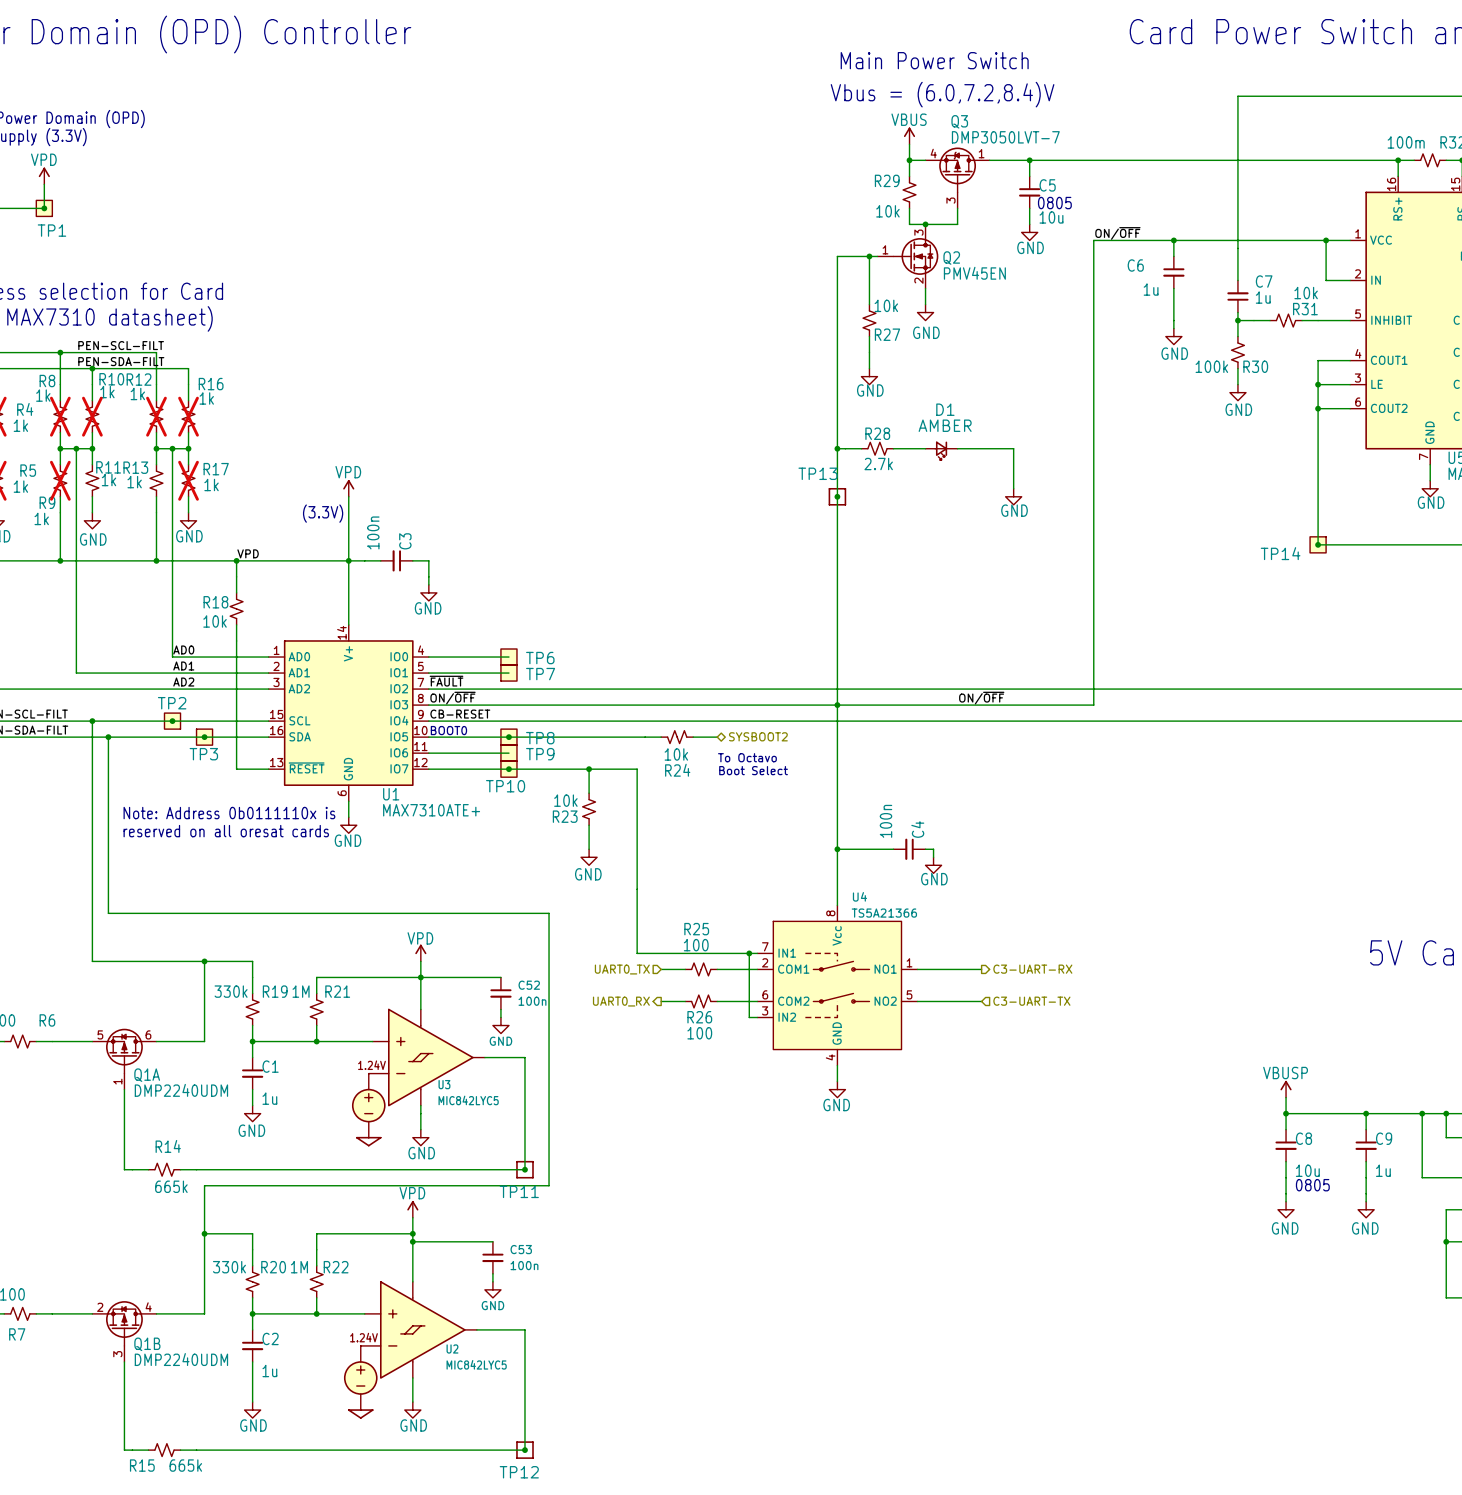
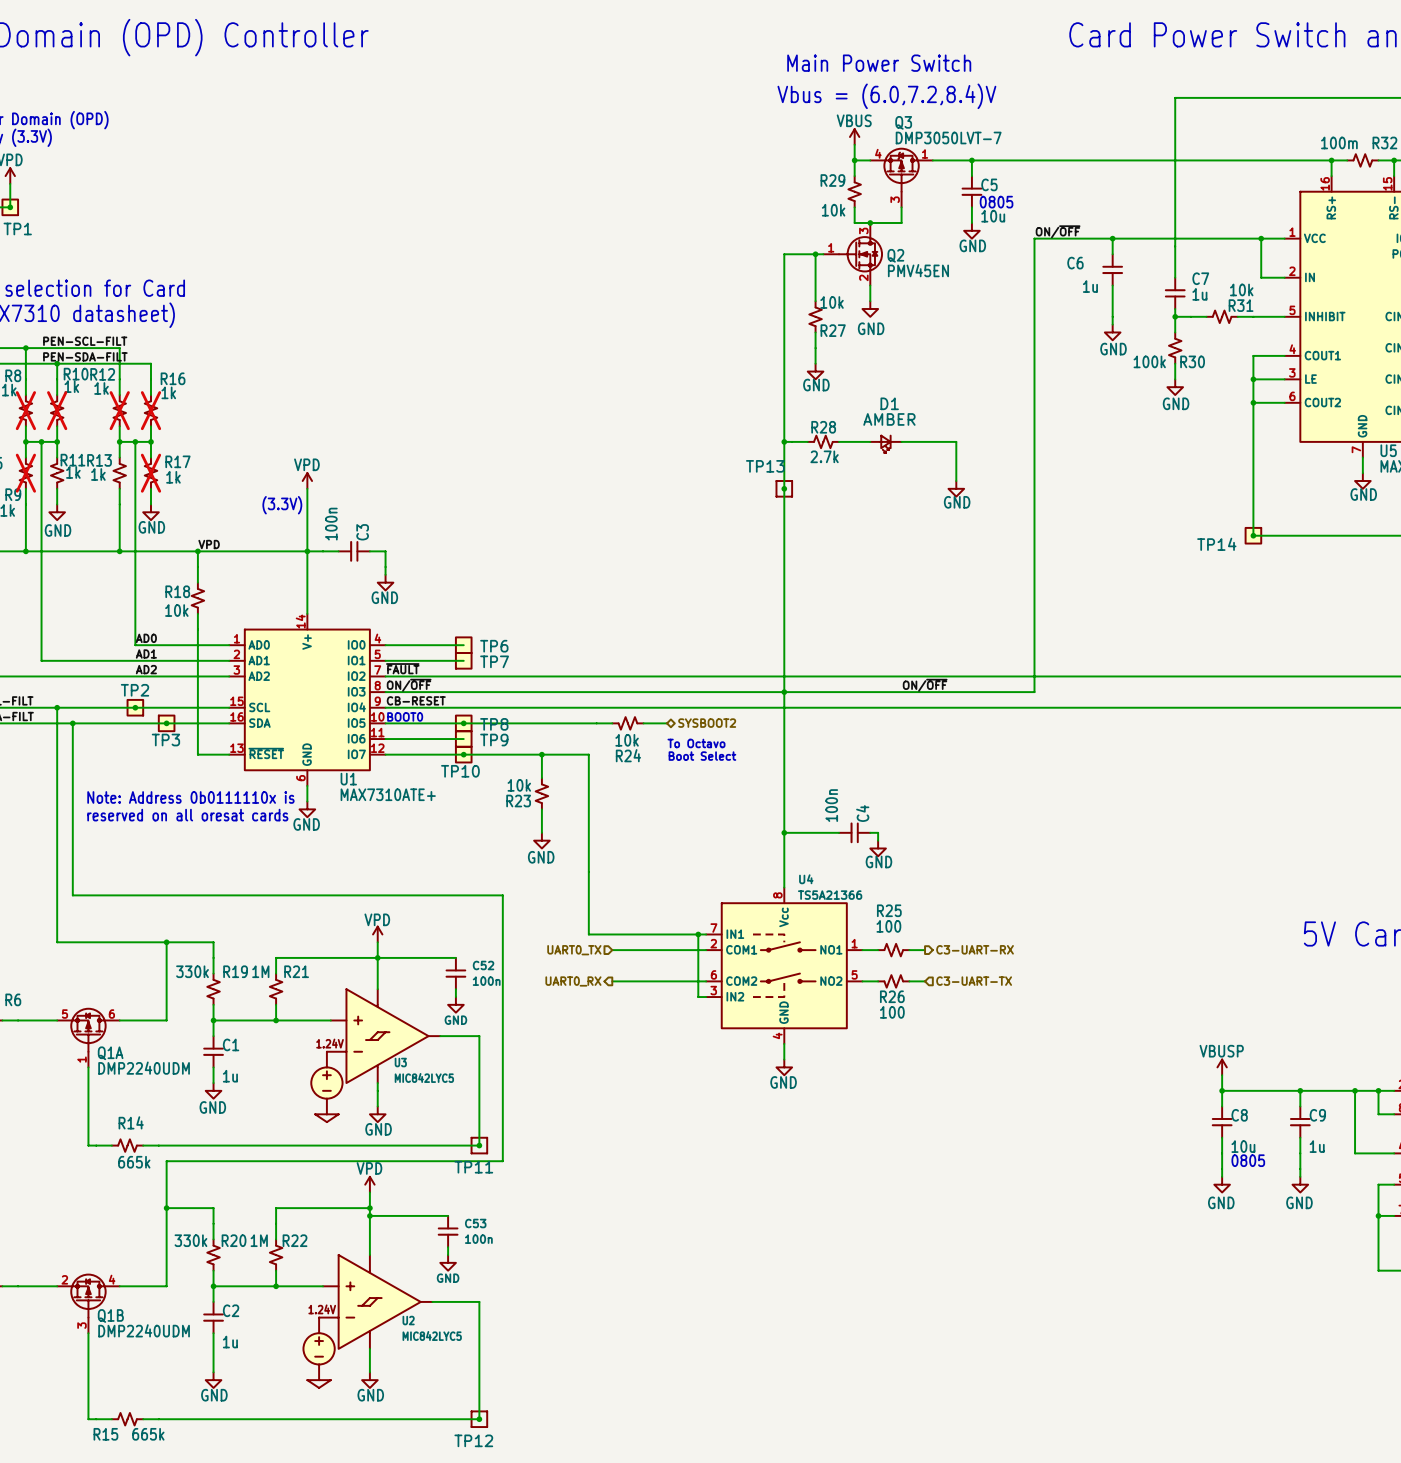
R25 position: (701, 969) -> (893, 950)
R26 position: (701, 1001) -> (893, 981)

